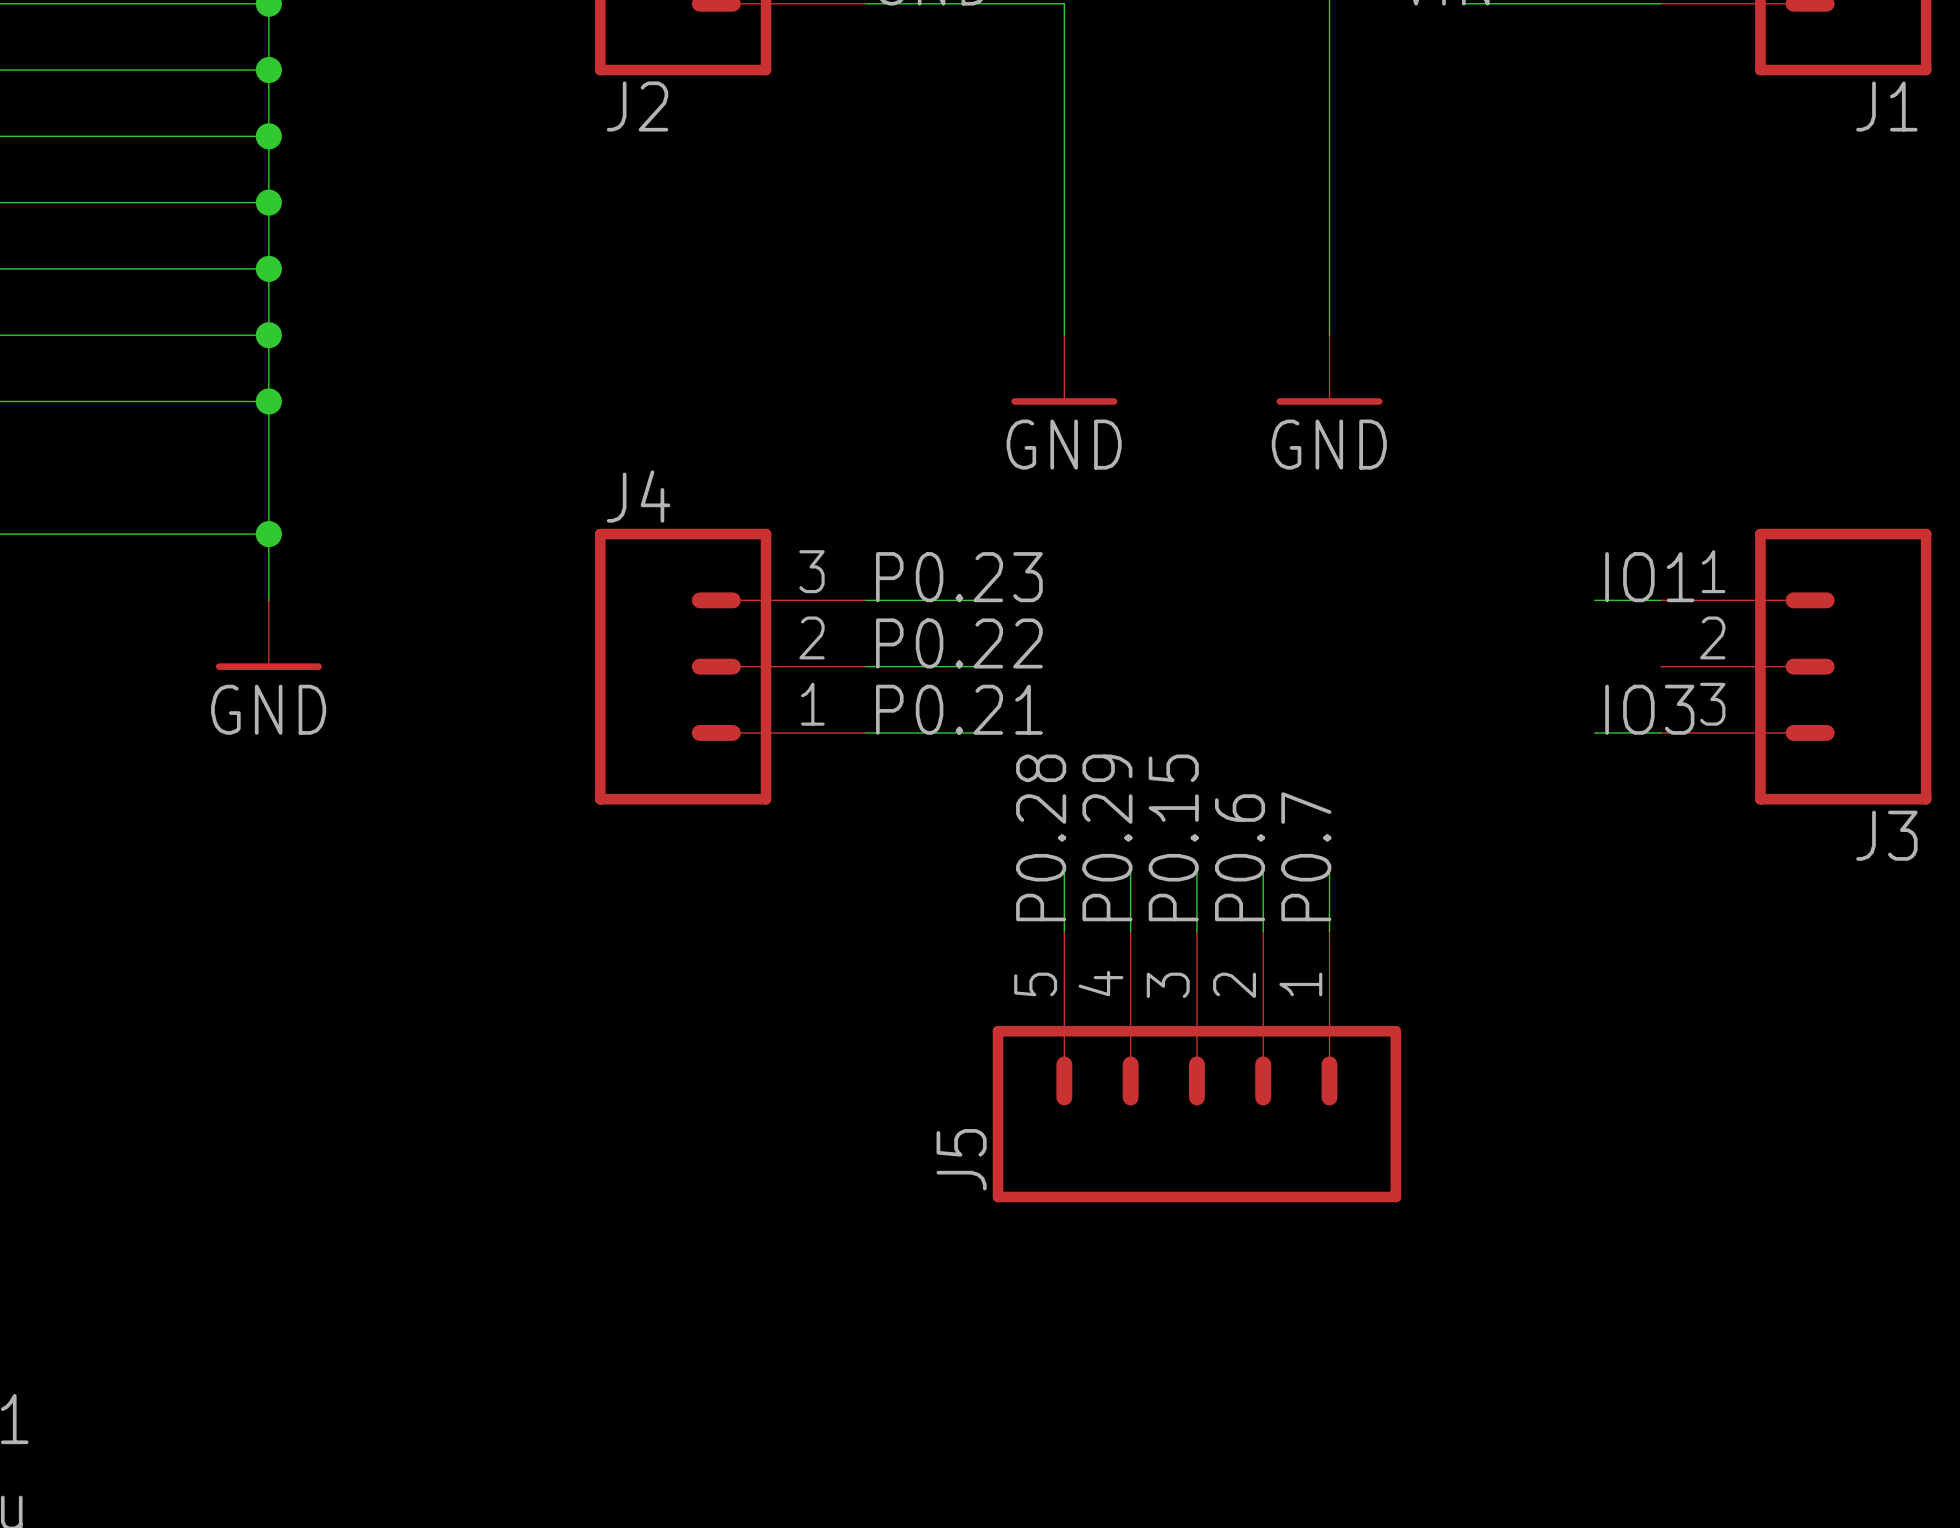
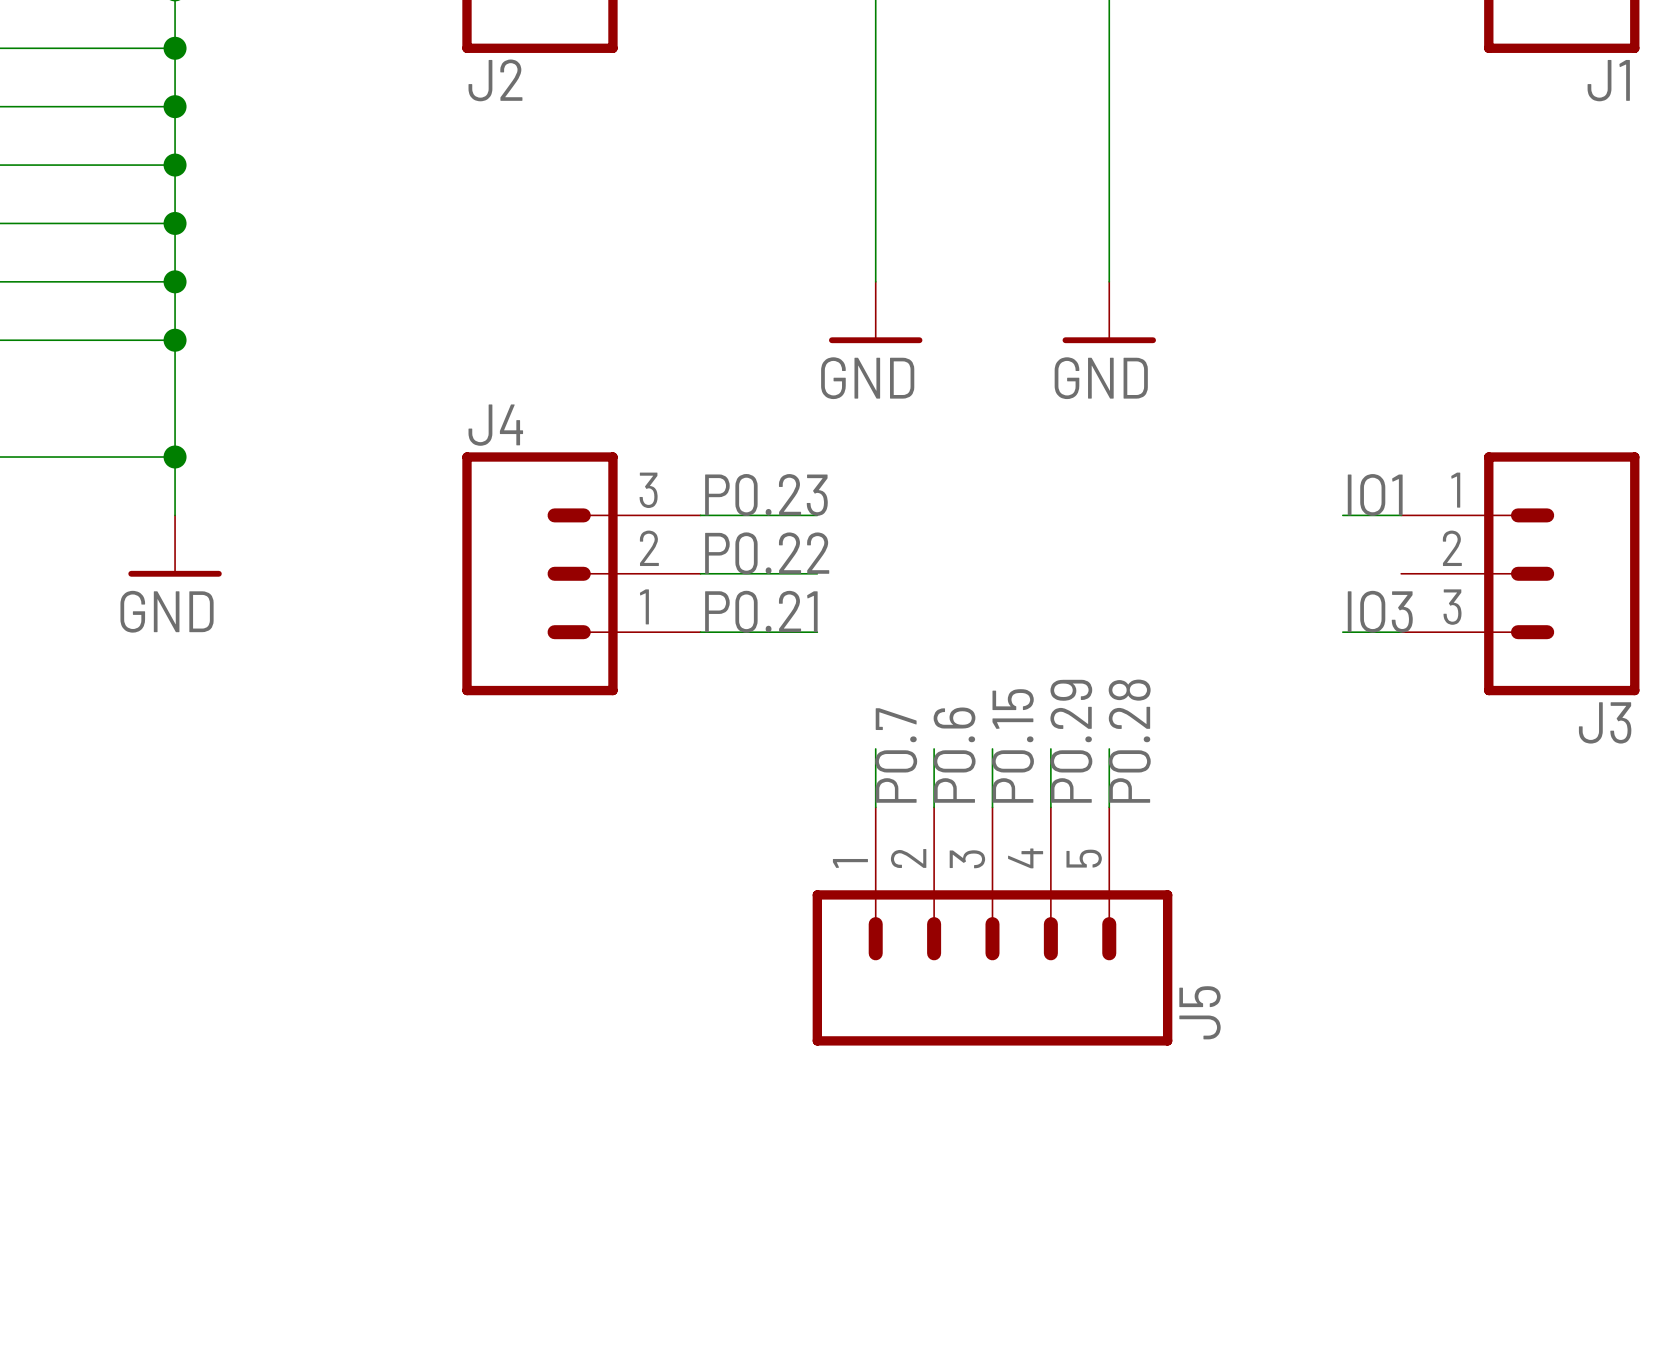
label position: P0.28 (1041, 837) -> P0.28 (1129, 741)
label position: P0.29 (1107, 837) -> P0.29 (1071, 741)
label position: P0.15 (1173, 837) -> P0.15 (1012, 745)
label position: P0.7 (1306, 856) -> P0.7 (896, 755)
label position: P0.6 (1240, 857) -> P0.6 (954, 755)
J5 flip: as is (1196, 1114) -> left-right (992, 967)

